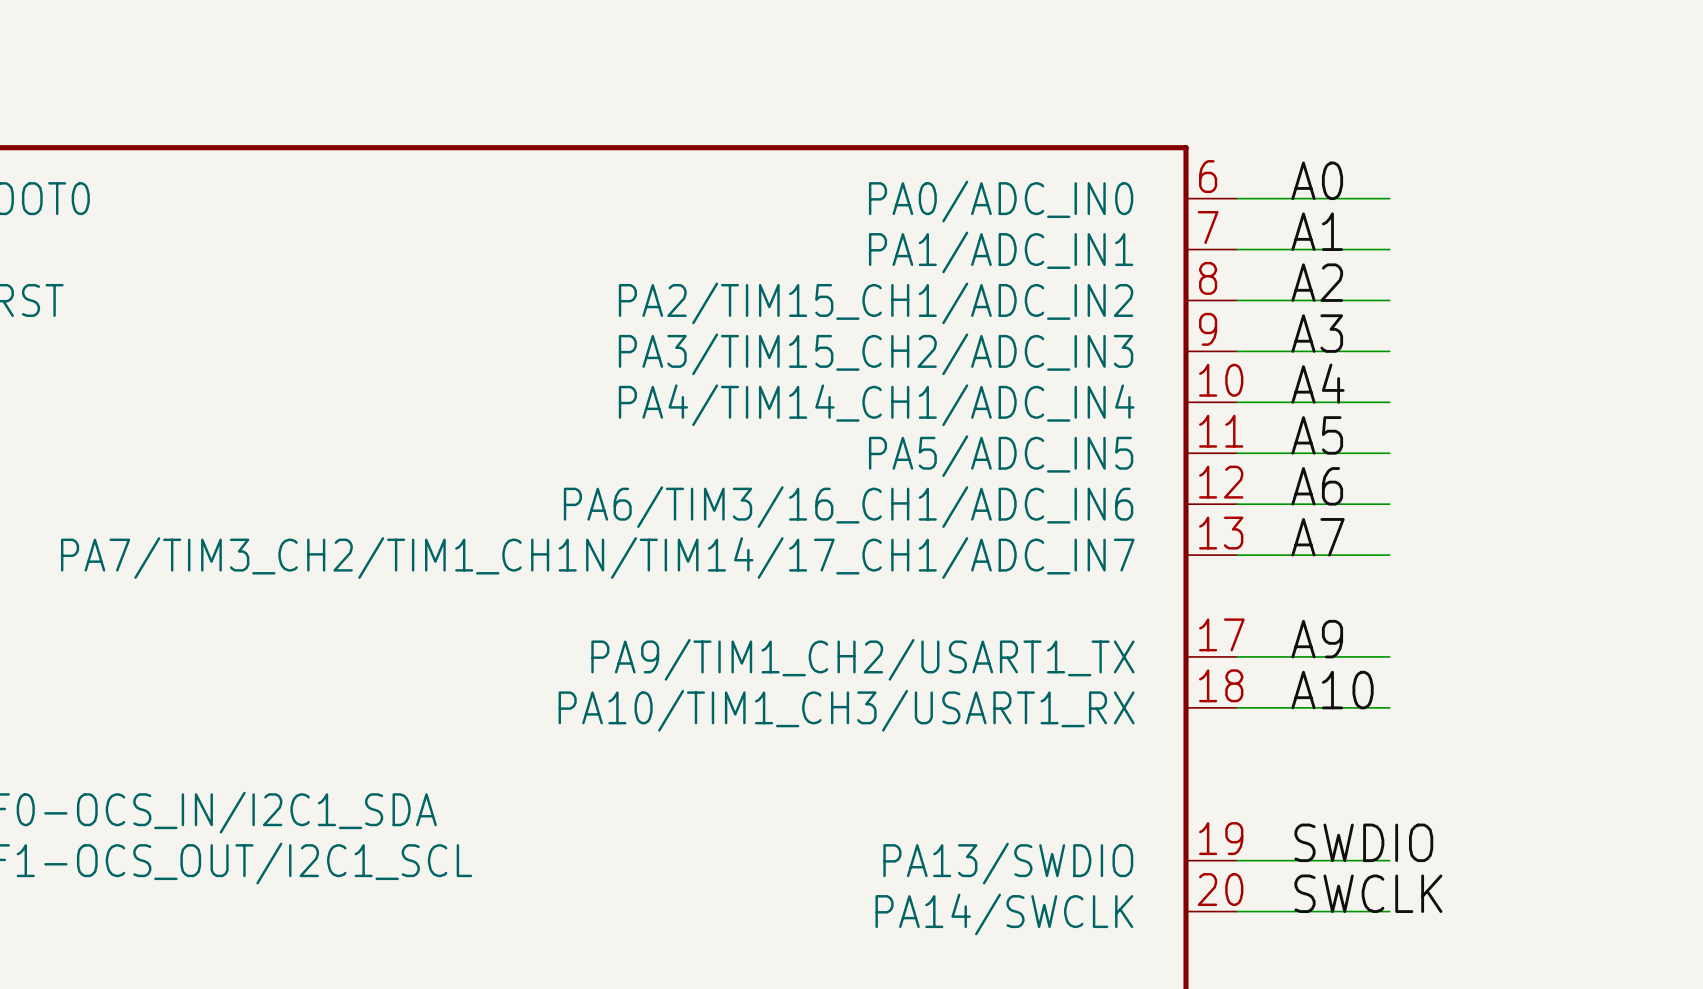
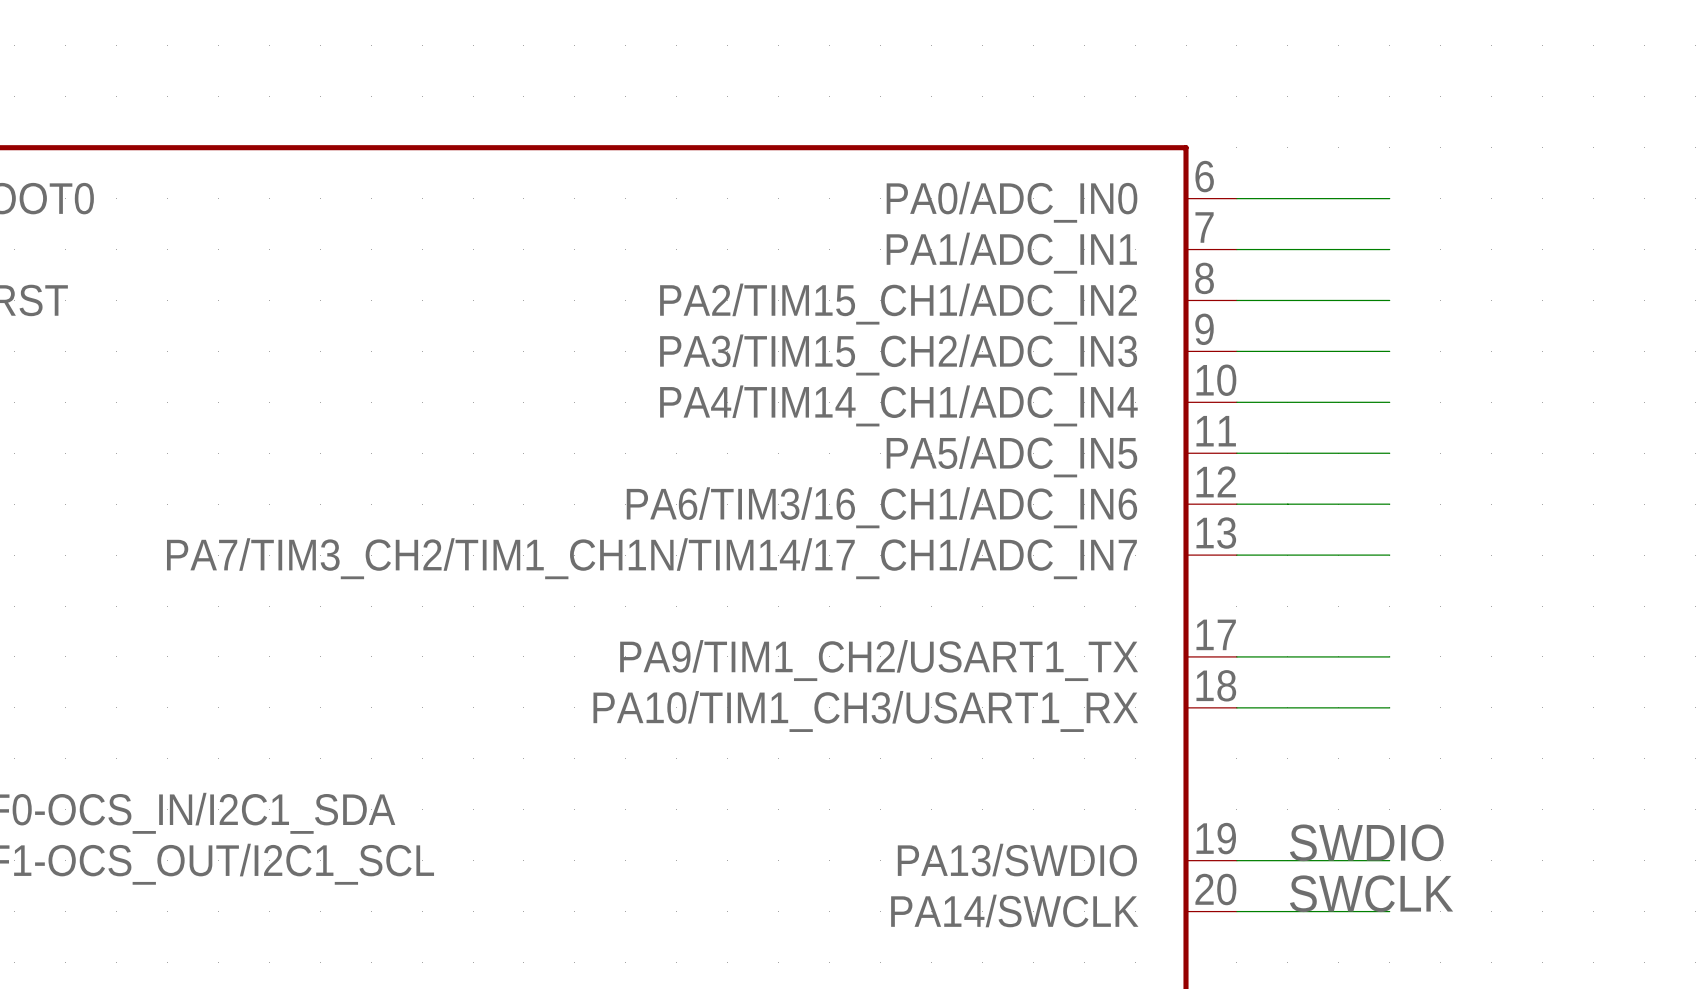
label: A0 (1317, 180) -> none
label: A1 (1317, 231) -> none
label: A2 (1317, 282) -> none
label: A3 (1317, 333) -> none
label: A4 (1317, 383) -> none
label: A5 (1317, 435) -> none
label: A6 (1317, 486) -> none
label: A7 (1317, 537) -> none
label: A9 (1317, 639) -> none
label: A10 (1332, 690) -> none

